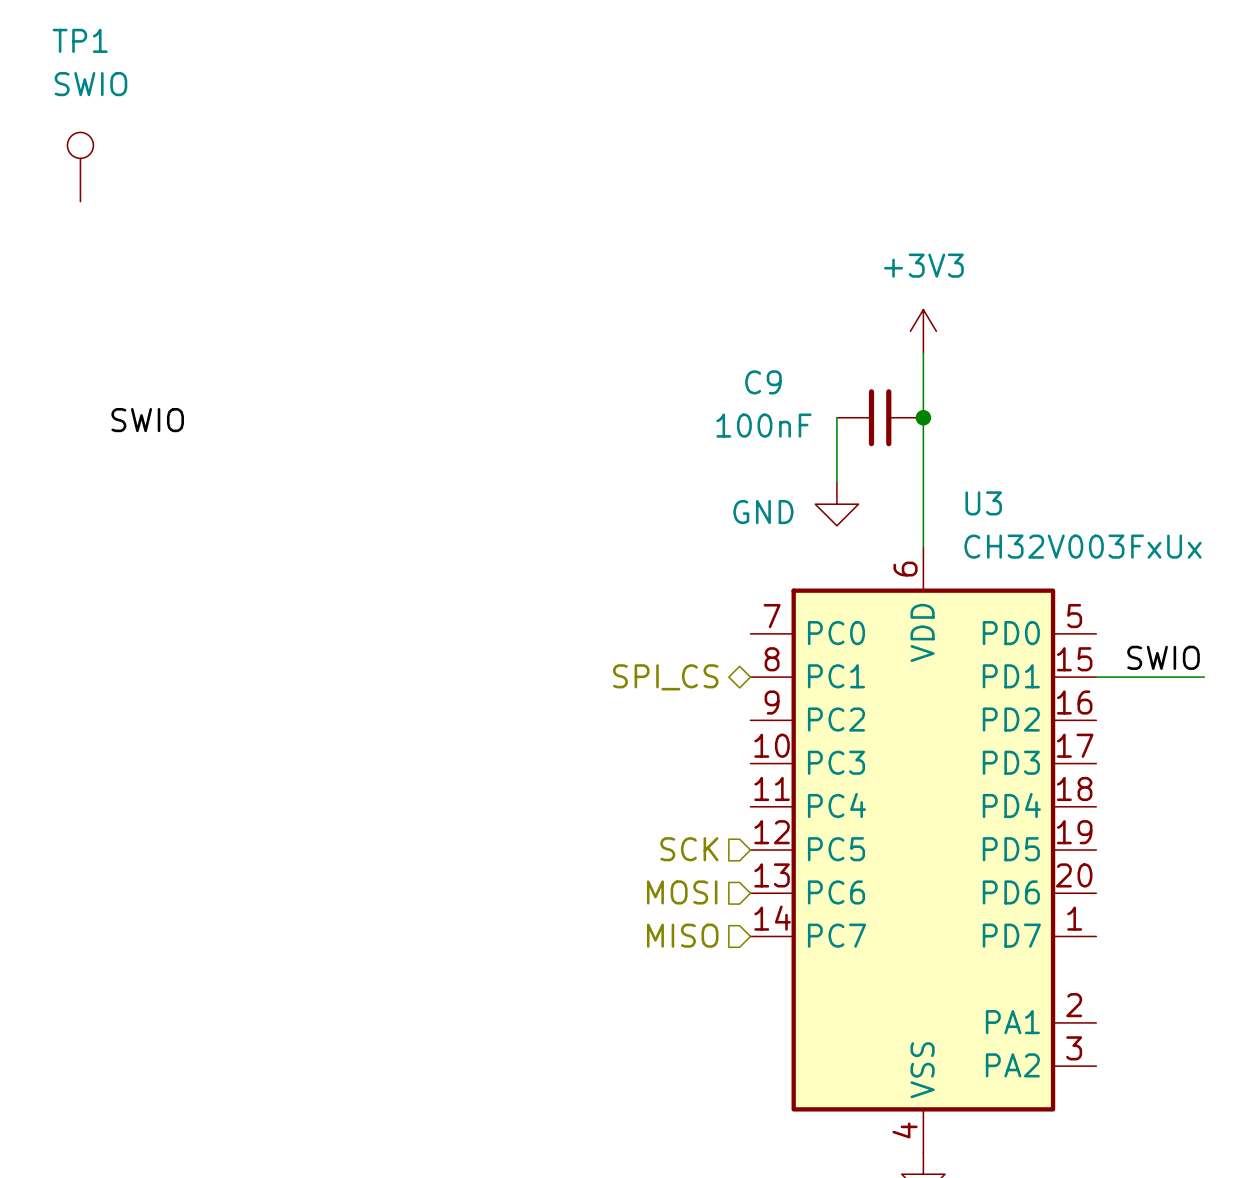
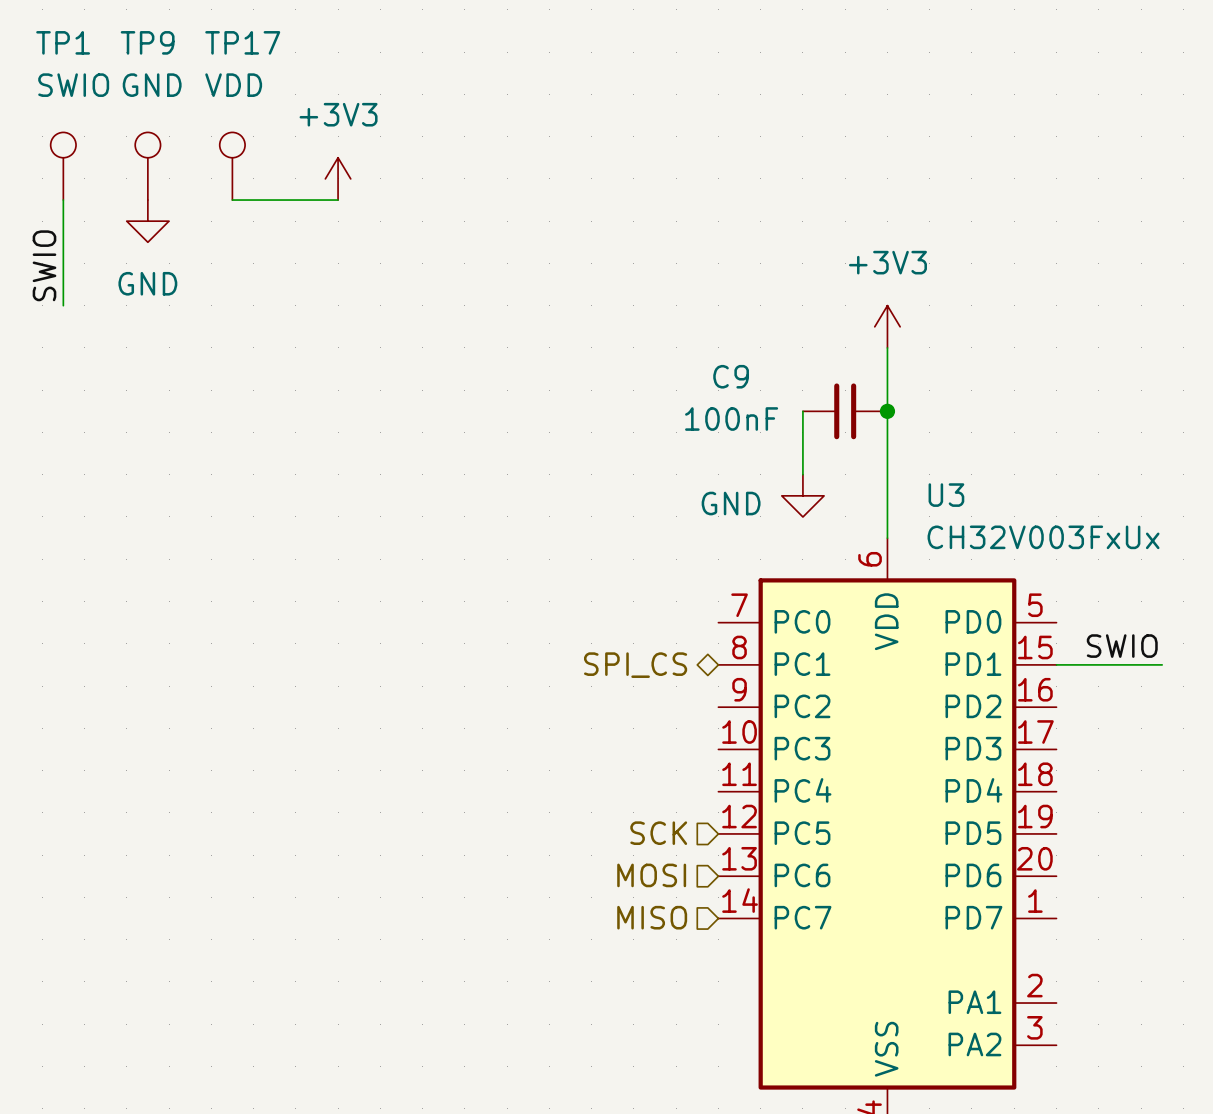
TP9: none -> GND (147, 166)
TP17: none -> VDD (232, 166)
power symbol: none -> +3V3 (338, 178)
wire: none -> (63, 200) (63, 305)
wire: none -> (232, 200) (338, 200)
power symbol: none -> GND (147, 221)
label rotation: 0° (147, 420) -> 90° counterclockwise (44, 265)
label position: SWIO (147, 420) -> SWIO (44, 265)

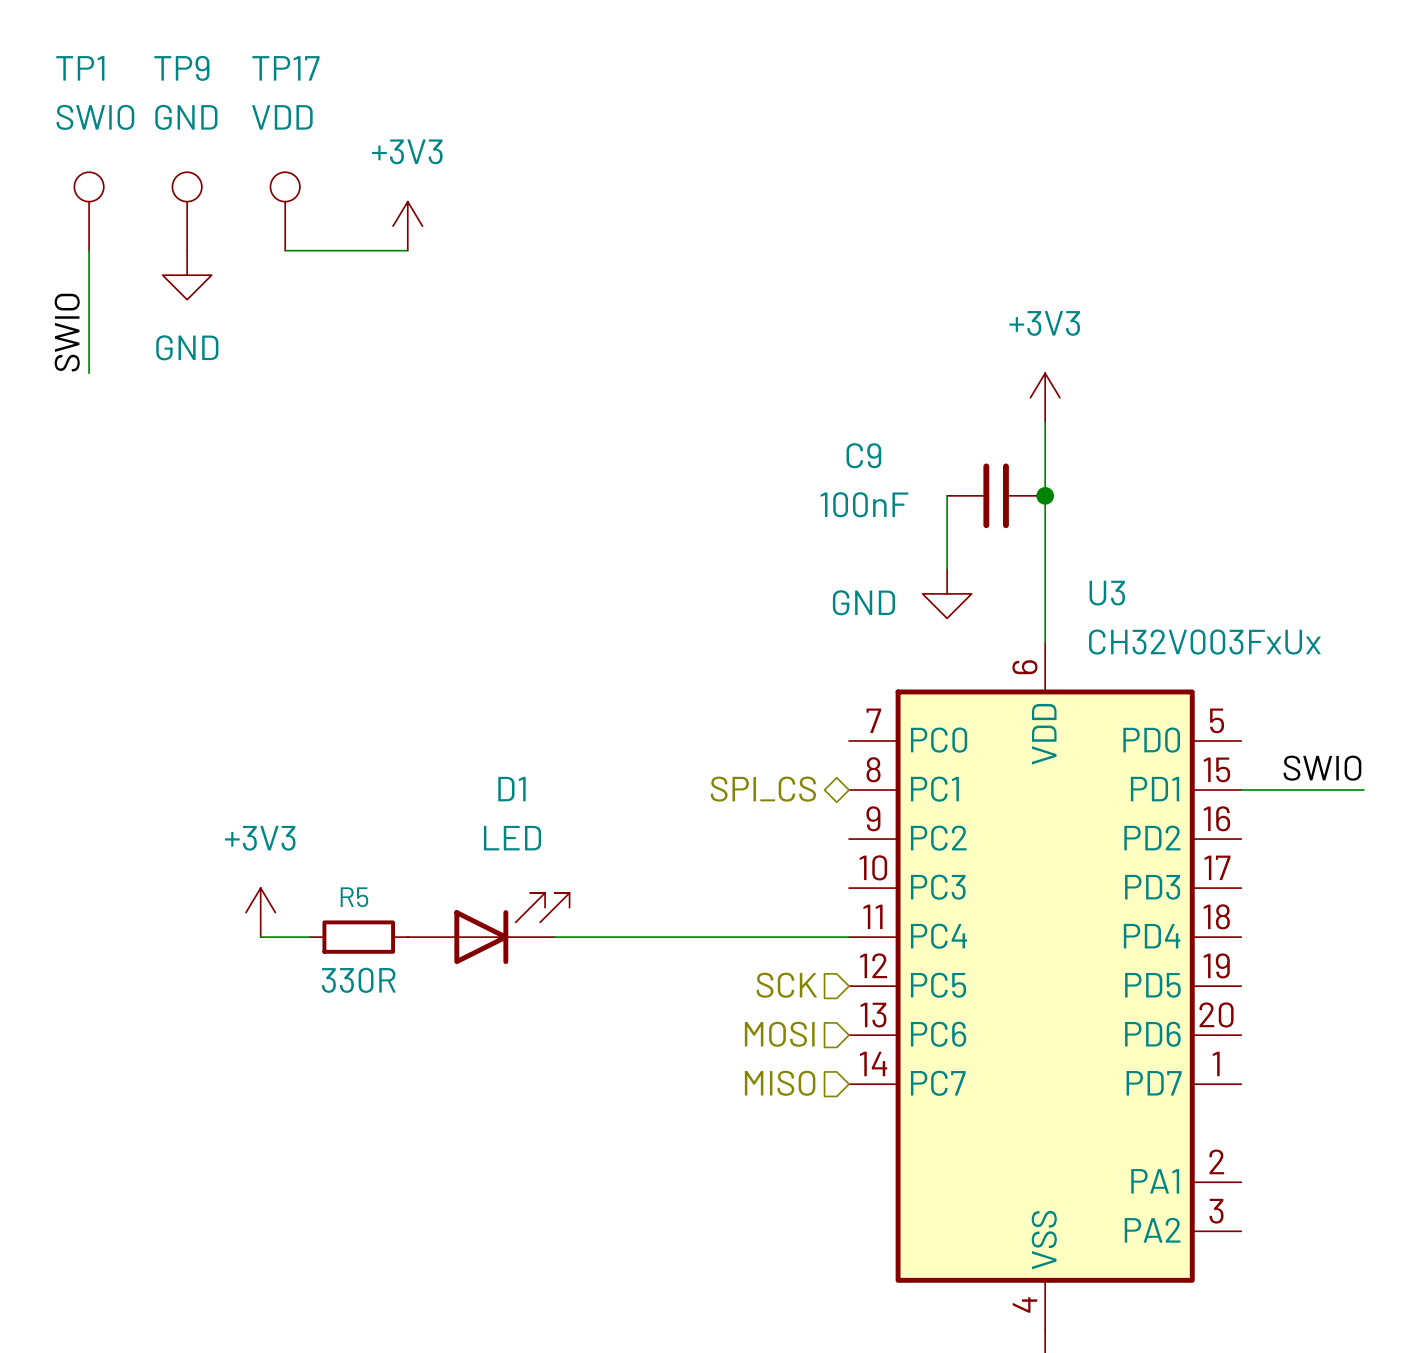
power symbol: none -> +3V3 (260, 912)
D1: none -> LED (488, 928)
wire: none -> (260, 937) (309, 937)
R5: none -> 330R (358, 937)
wire: none -> (554, 937) (849, 937)

